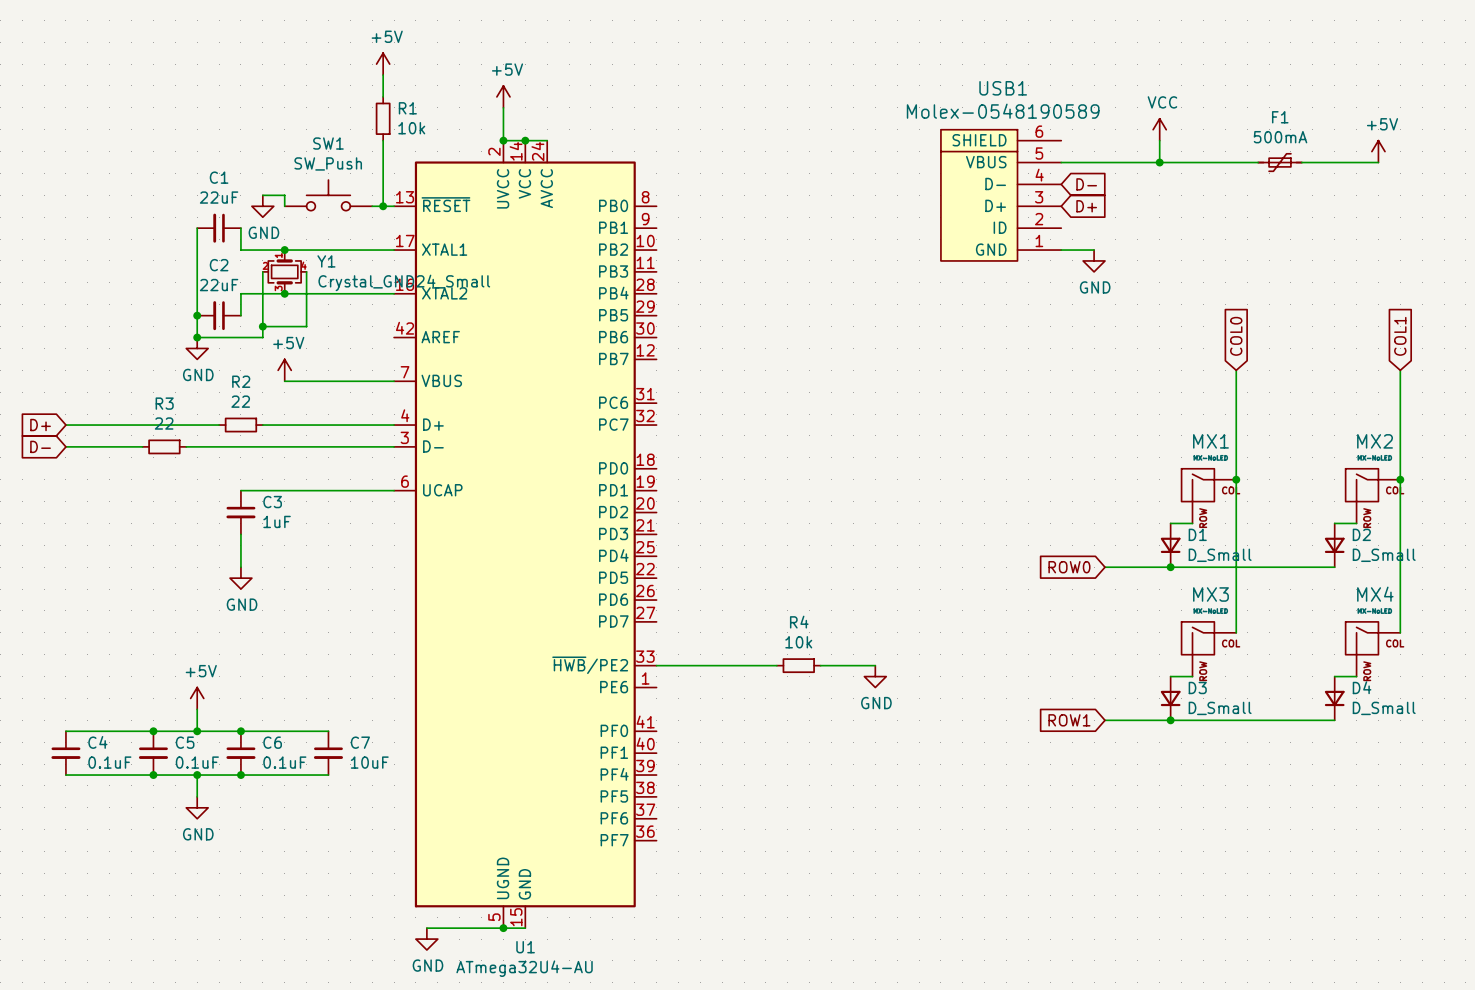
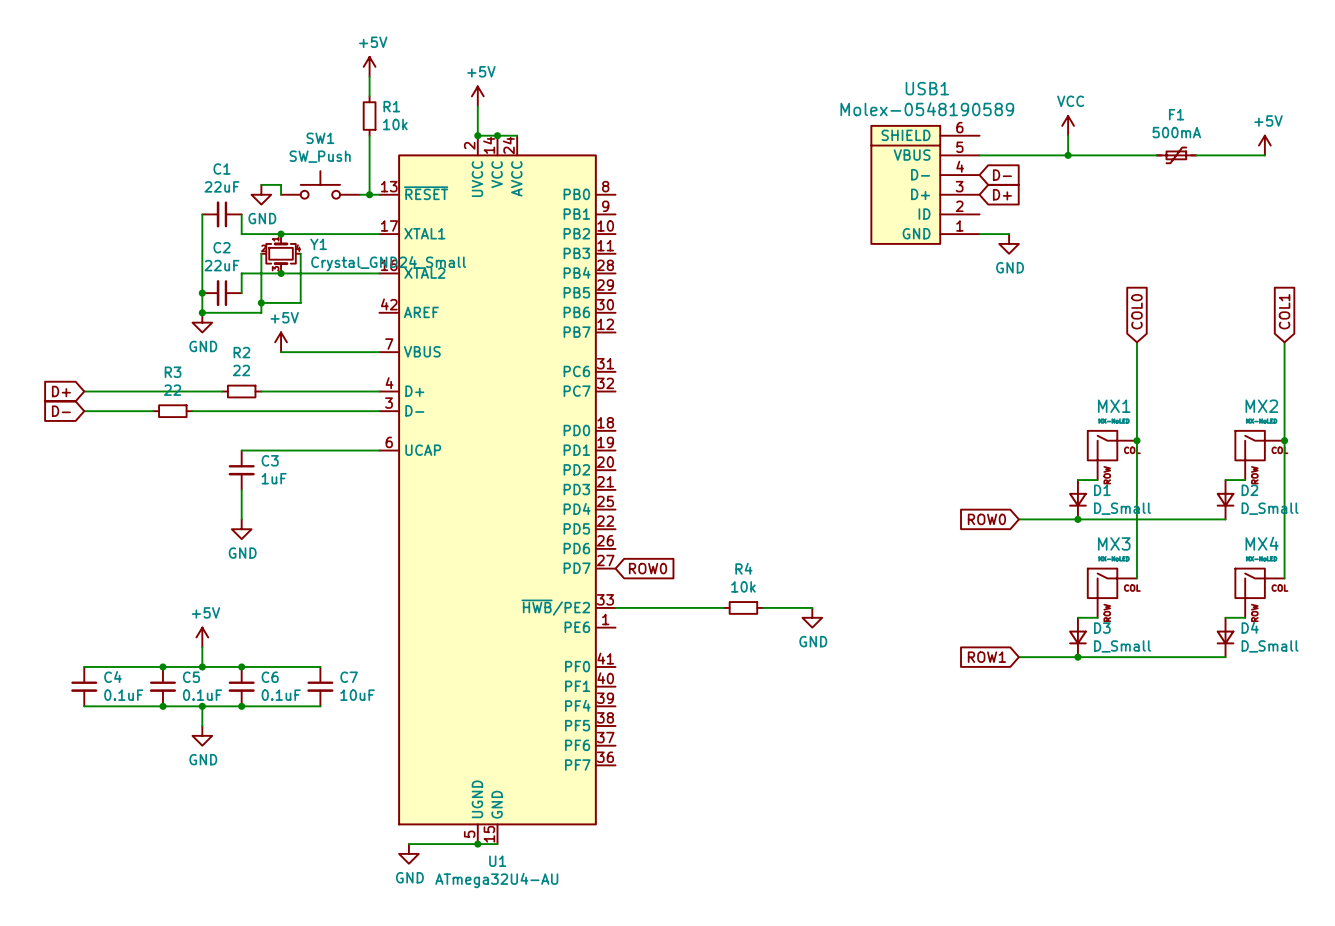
global label: none -> ROW0 (648, 568)

